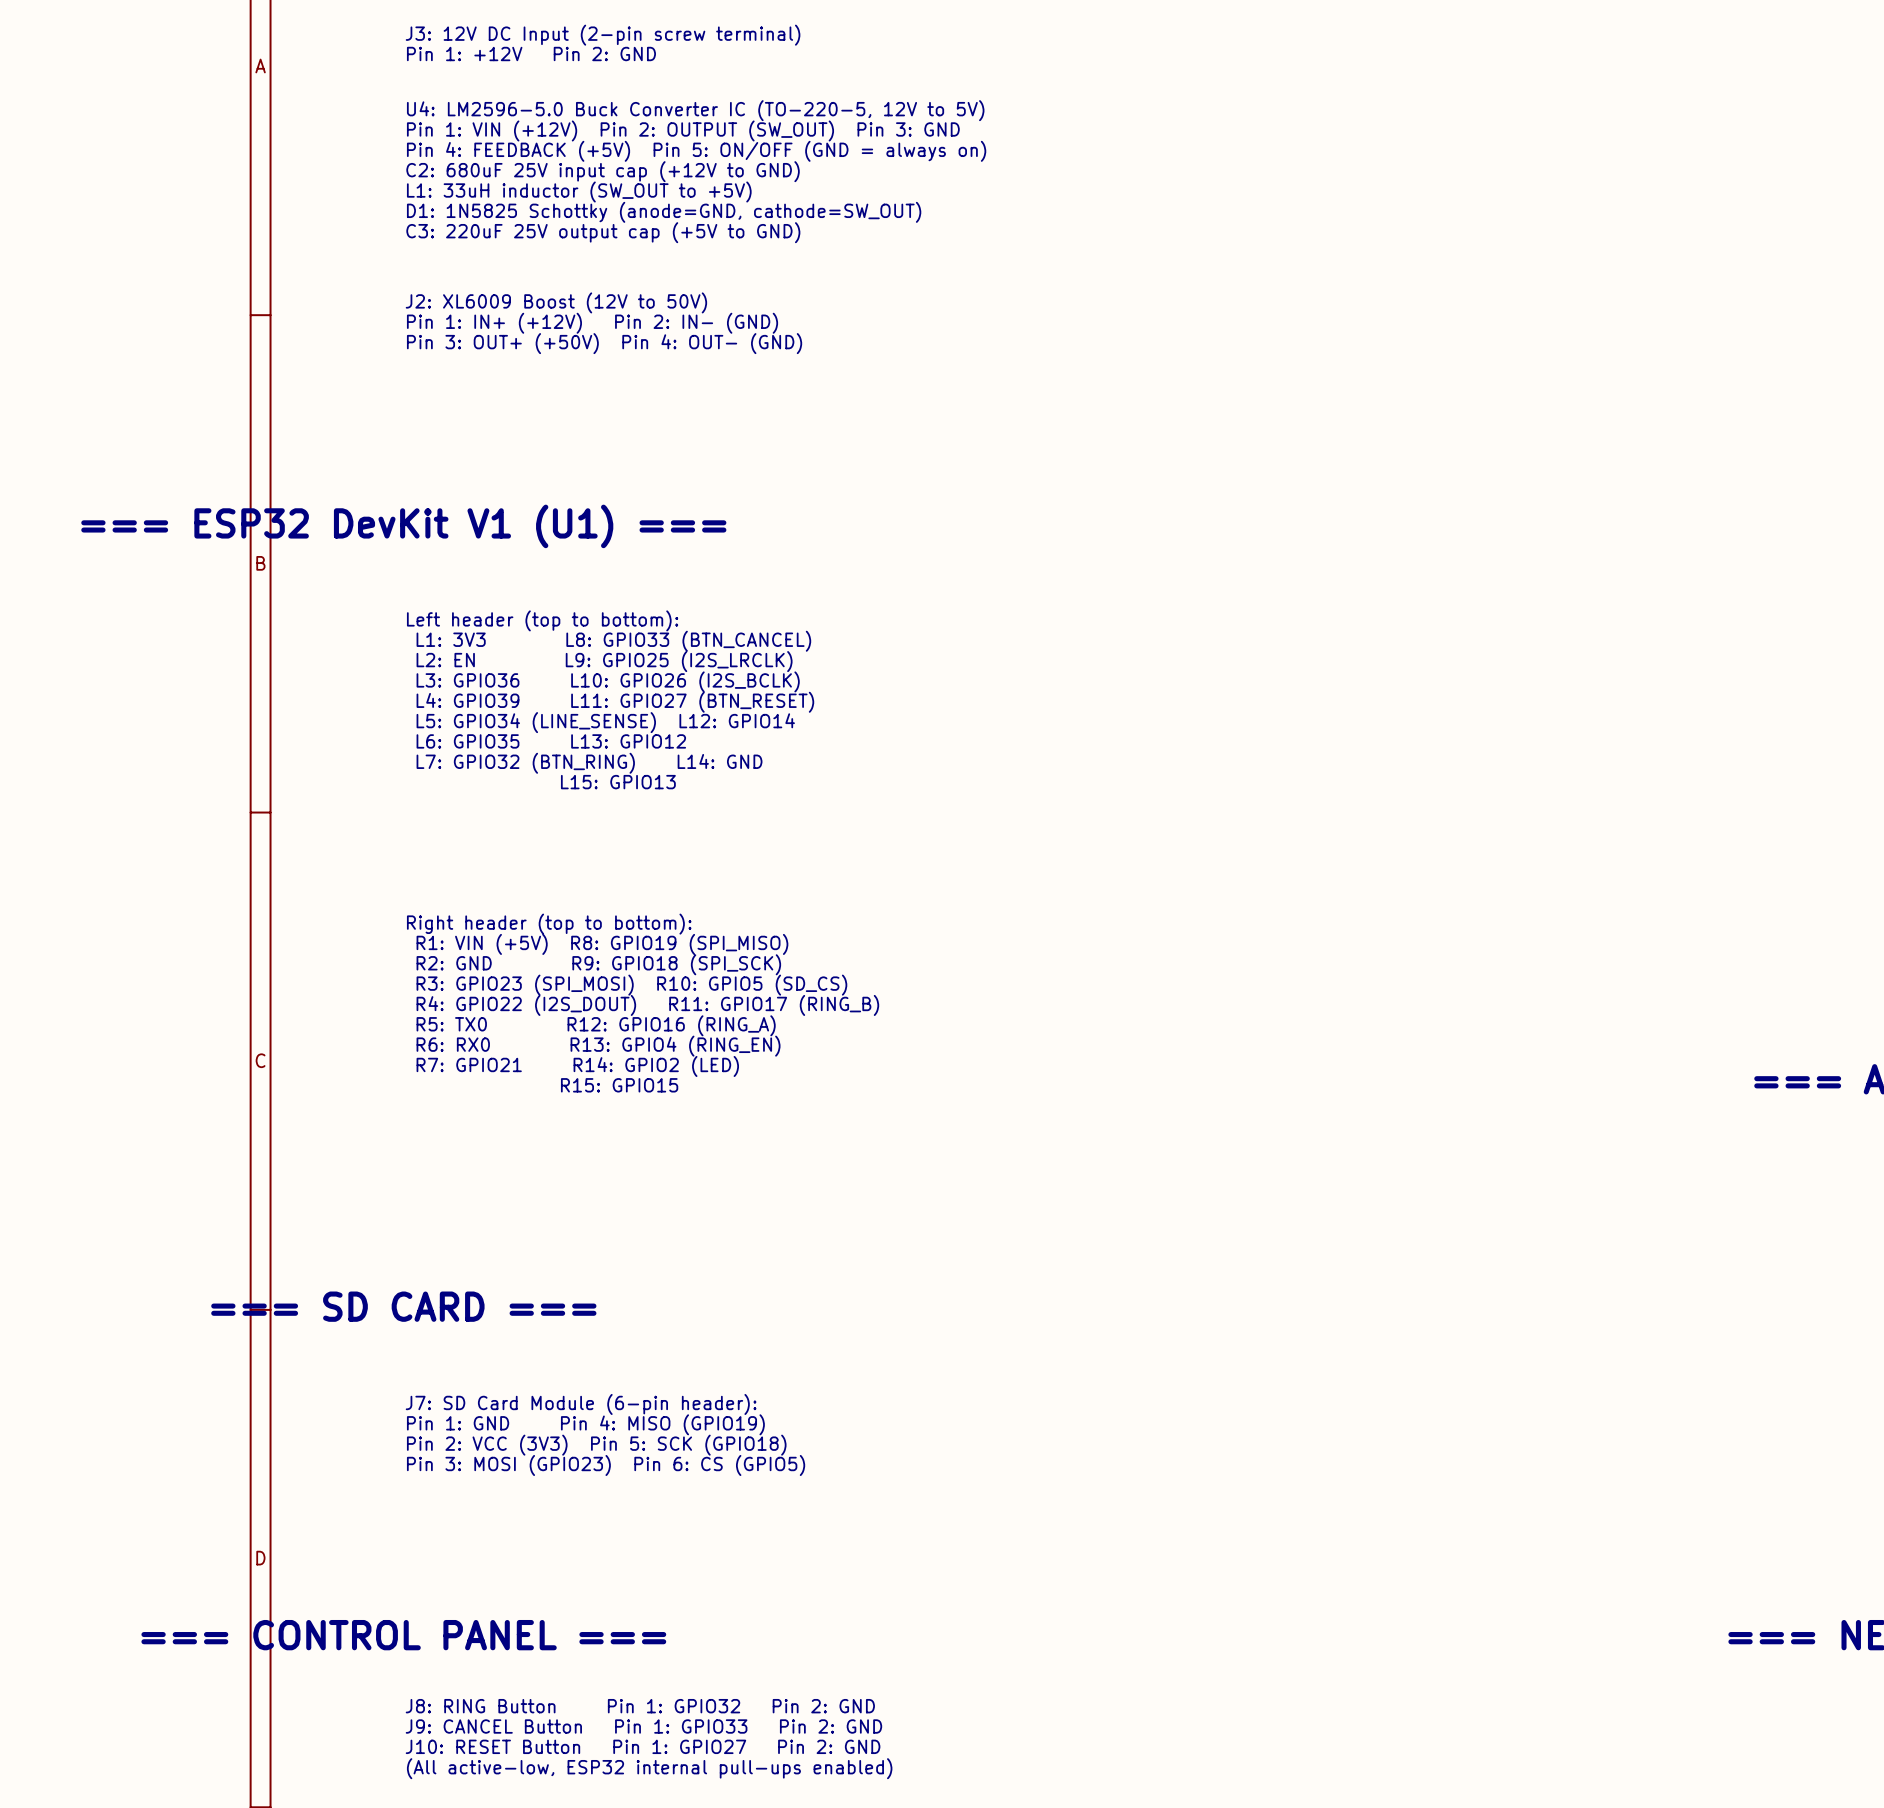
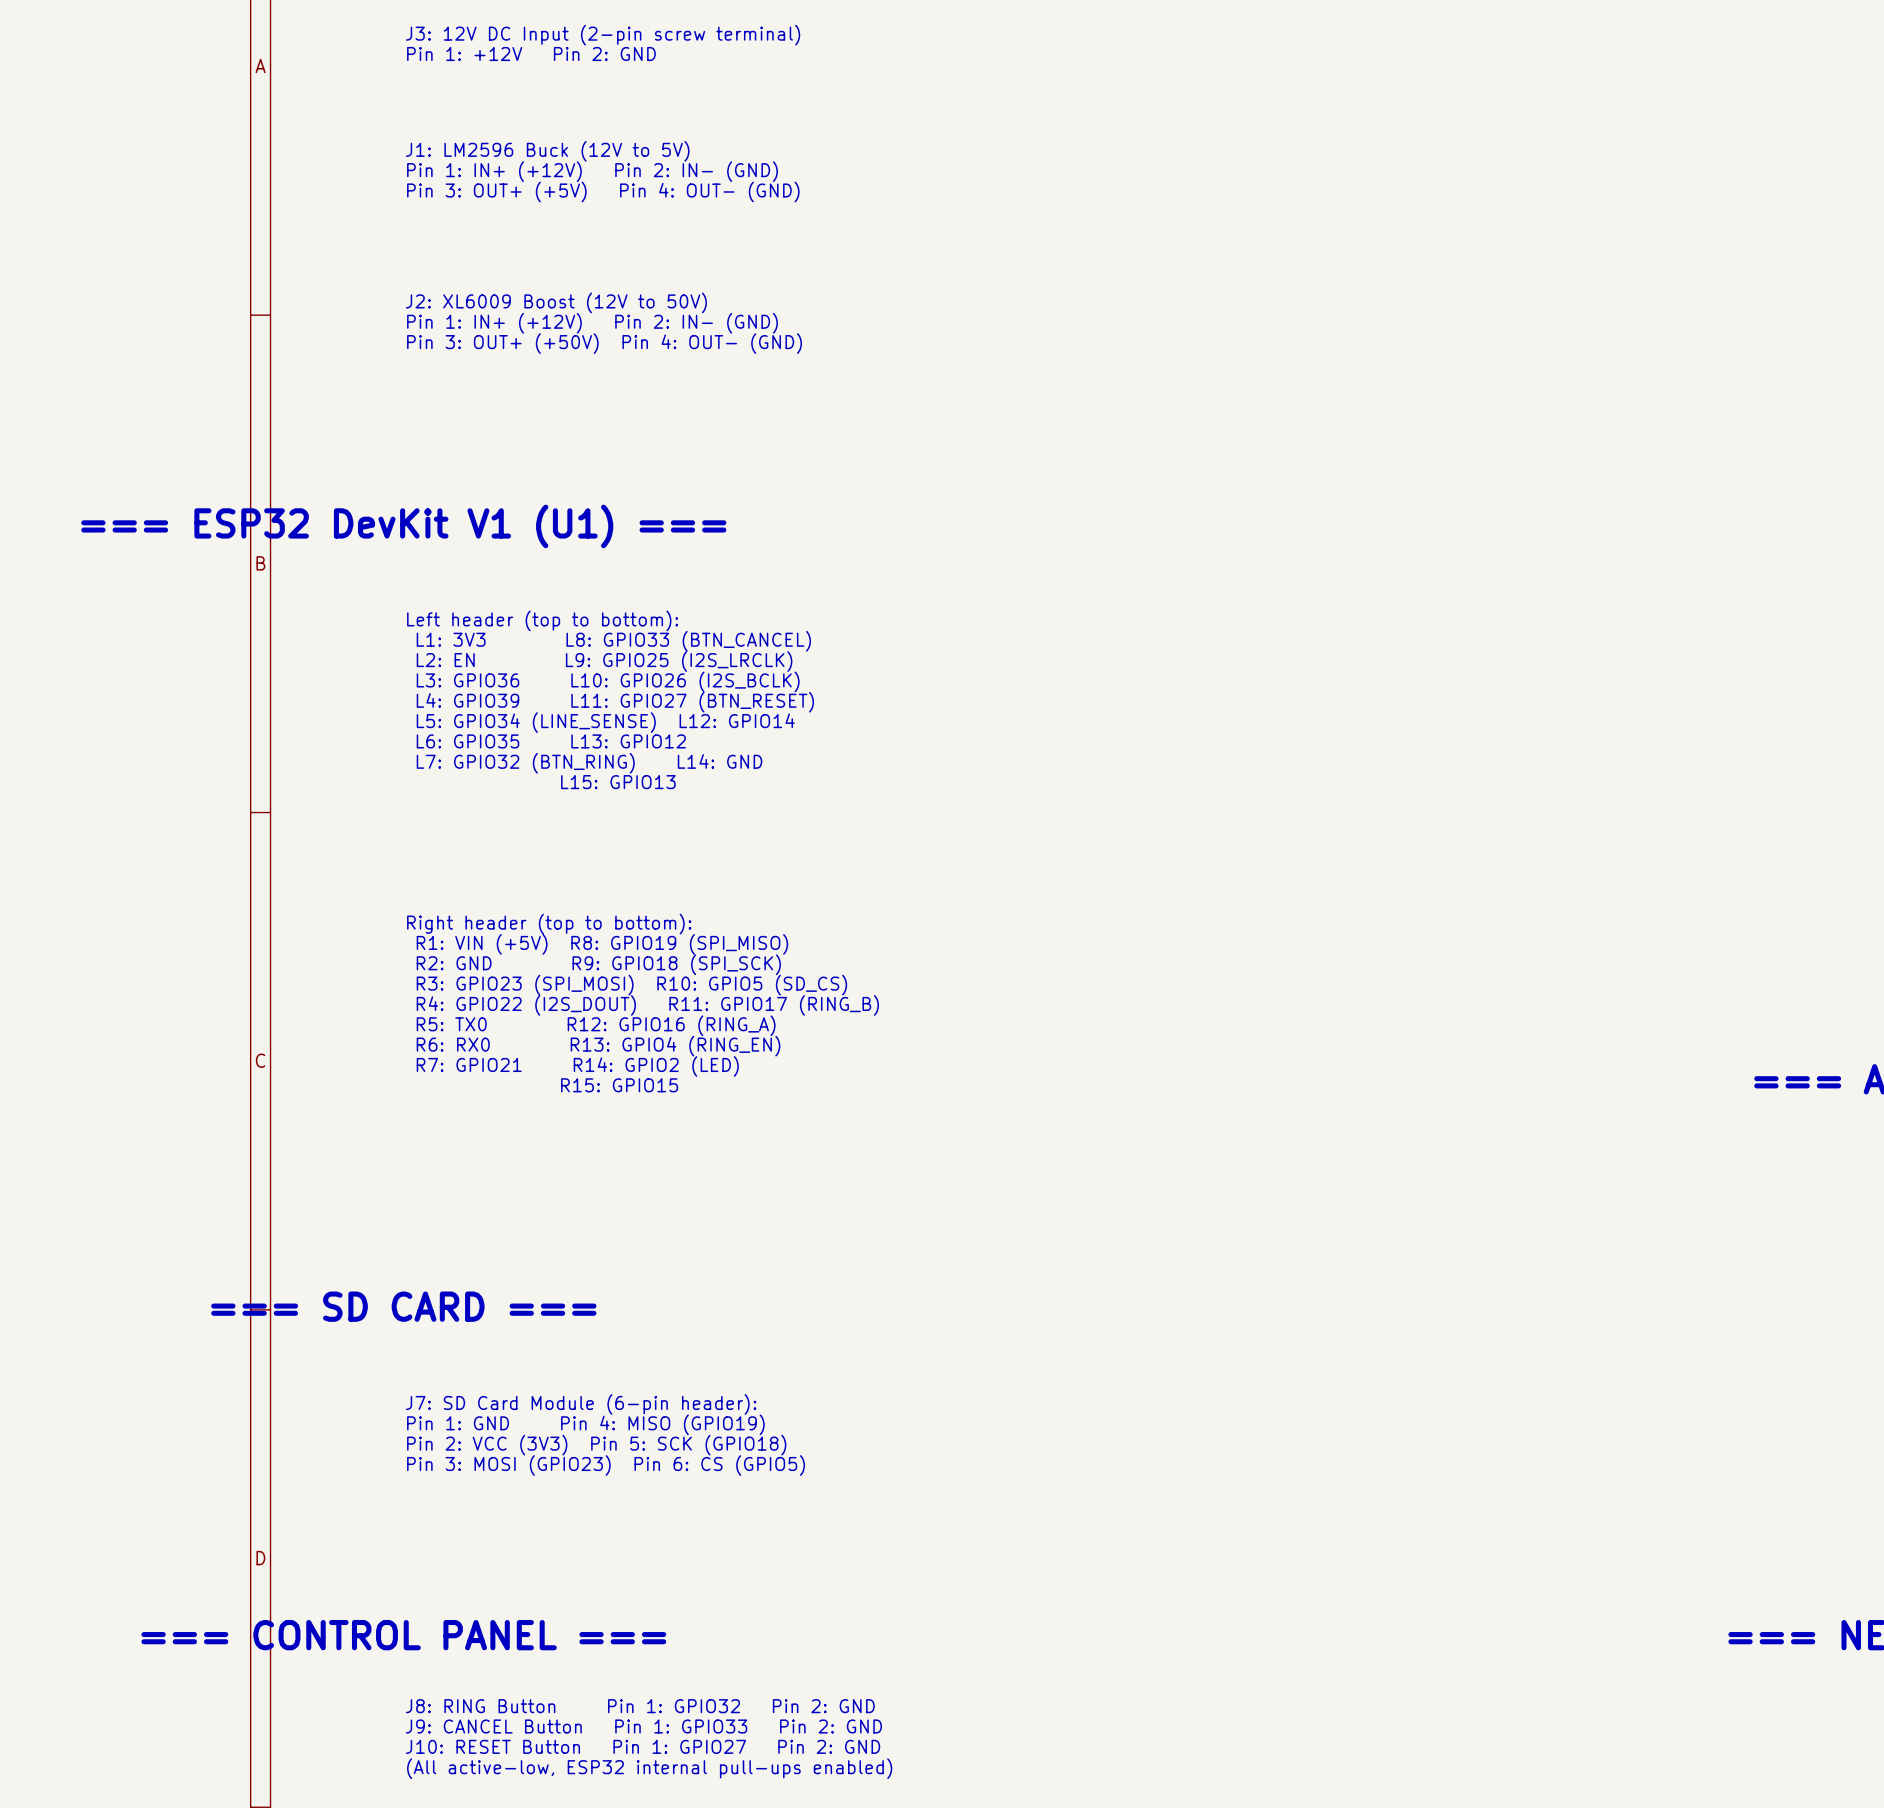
text: U4: LM2596-5.0 Buck Converter IC (TO-220-5, 12V to 5V) (695, 110) -> none
text: Pin 1: VIN (+12V) Pin 2: OUTPUT (SW_OUT) Pin 3: GND (683, 130) -> none
text: Pin 4: FEEDBACK (+5V) Pin 5: ON/OFF (GND = always on) (696, 151) -> J1: LM2596 Buck (12V to 5V) (547, 151)
text: C2: 680uF 25V input cap (+12V to GND) (603, 171) -> Pin 1: IN+ (+12V) Pin 2: IN- (GND) (592, 171)
text: L1: 33uH inductor (SW_OUT to +5V) (579, 192) -> Pin 3: OUT+ (+5V) Pin 4: OUT- (GND) (603, 192)
text: D1: 1N5825 Schottky (anode=GND, cathode=SW_OUT) (664, 212) -> none
text: C3: 220uF 25V output cap (+5V to GND) (603, 232) -> none

